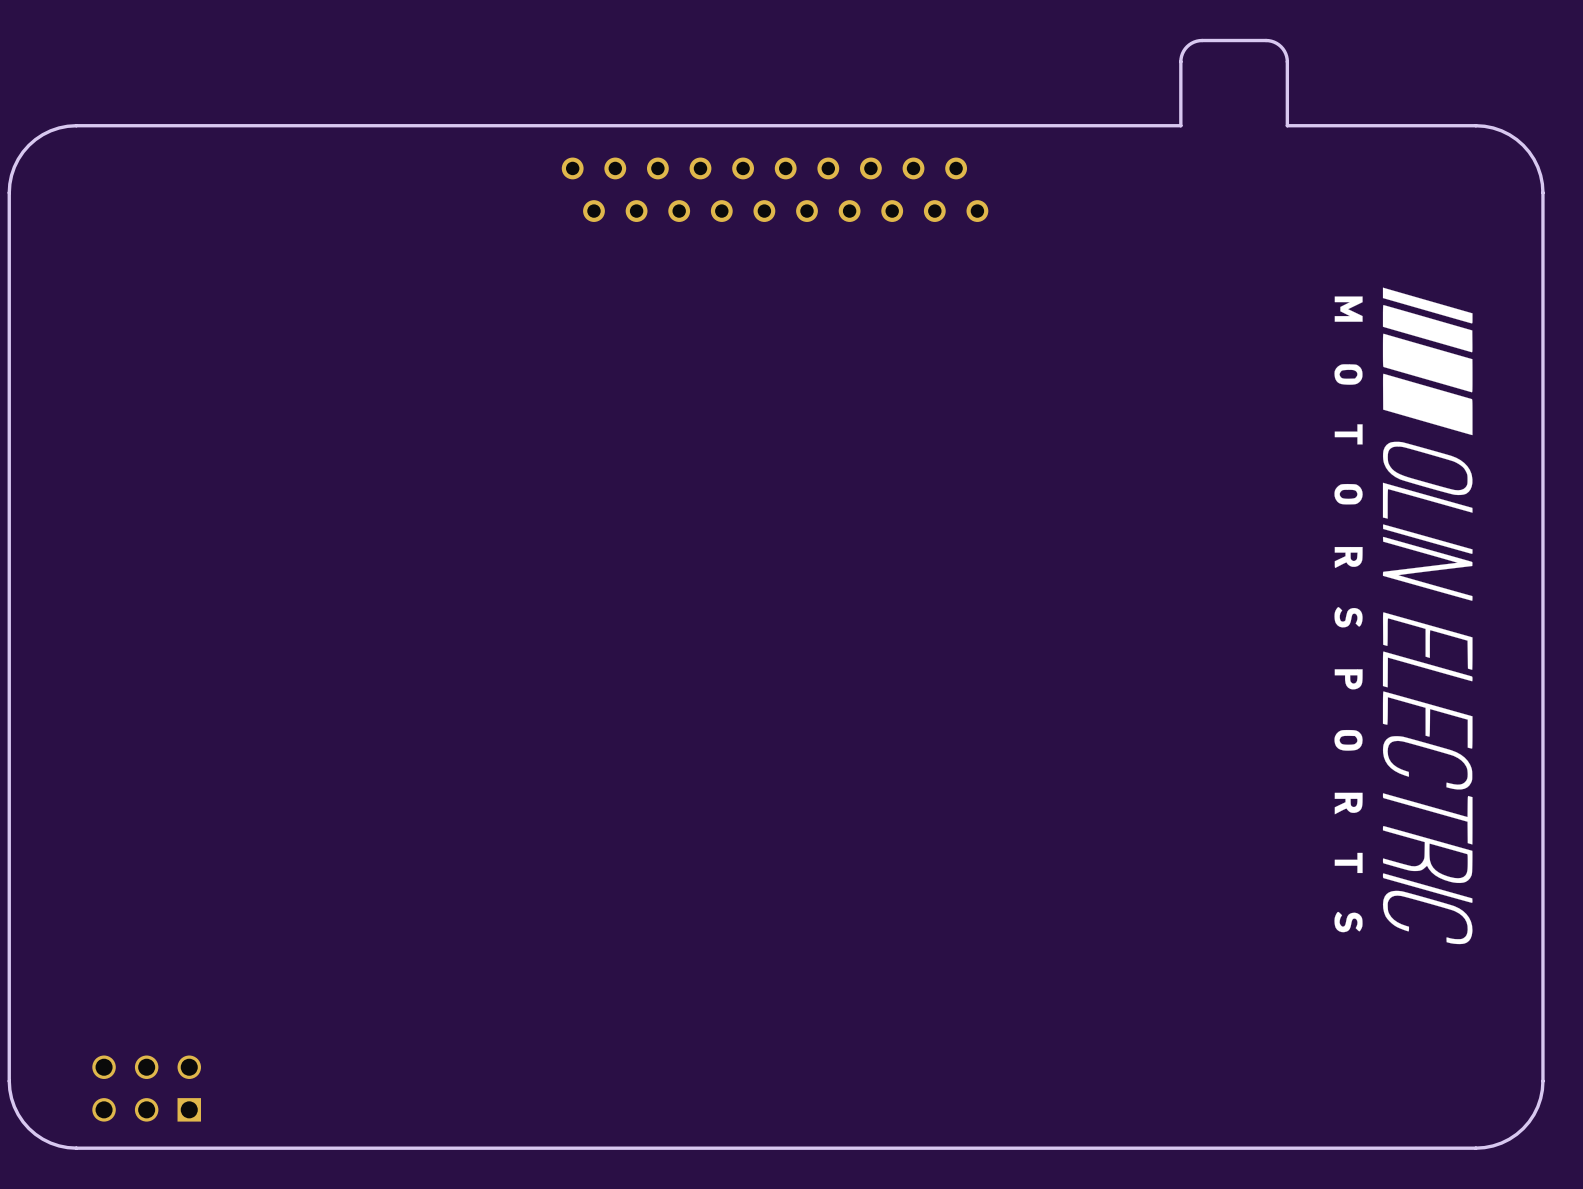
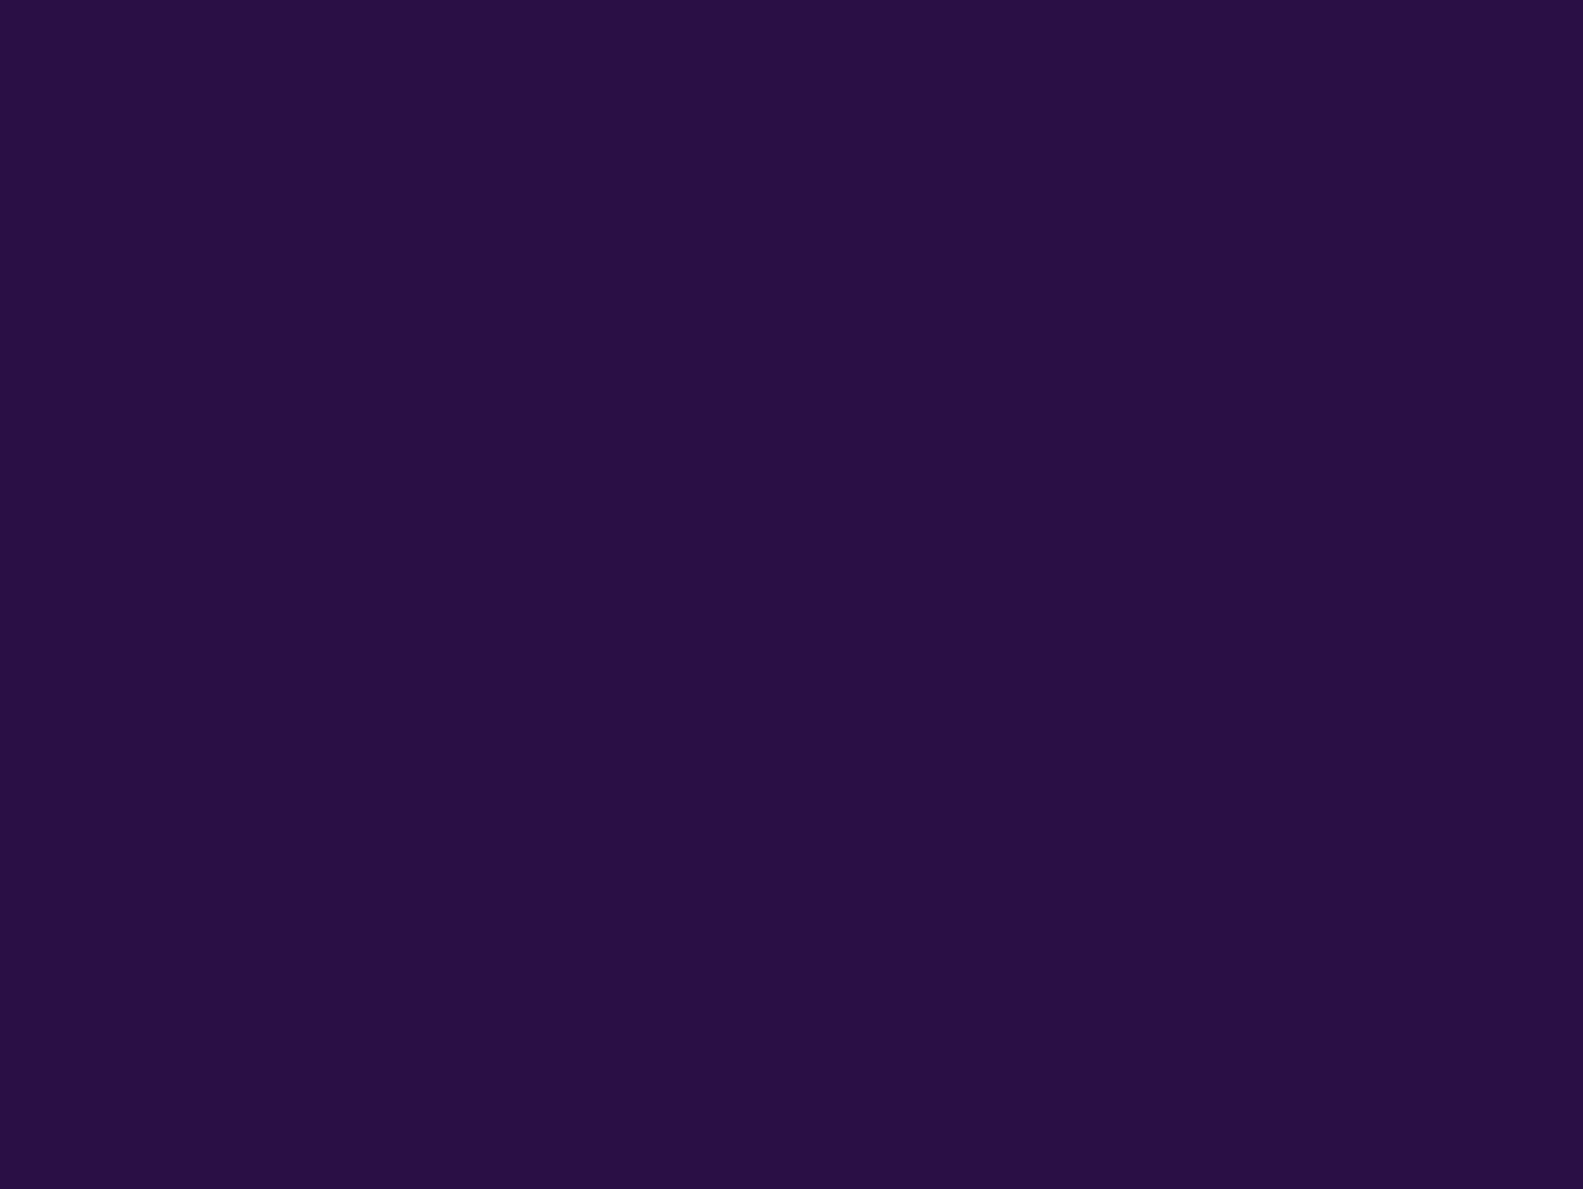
board edge: (1266, 40) (1199, 40) (1187, 46) (1181, 59) (1180, 125) (76, 125) (50, 130) (35, 139) (18, 159) (11, 175) (9, 192) (9, 1081) (14, 1106) (23, 1121) (35, 1134) (50, 1143) (76, 1148) (1475, 1148) (1493, 1145) (1516, 1134) (1529, 1121) (1537, 1106) (1542, 1081) (1542, 192) (1540, 175) (1533, 159) (1523, 145) (1509, 134) (1484, 126) (1287, 125) (1286, 56) (1279, 44) (1266, 40) -> none
part: (775, 189) -> none
drawing: [1334, 287, 1473, 945] -> none
part: (146, 1088) -> none

